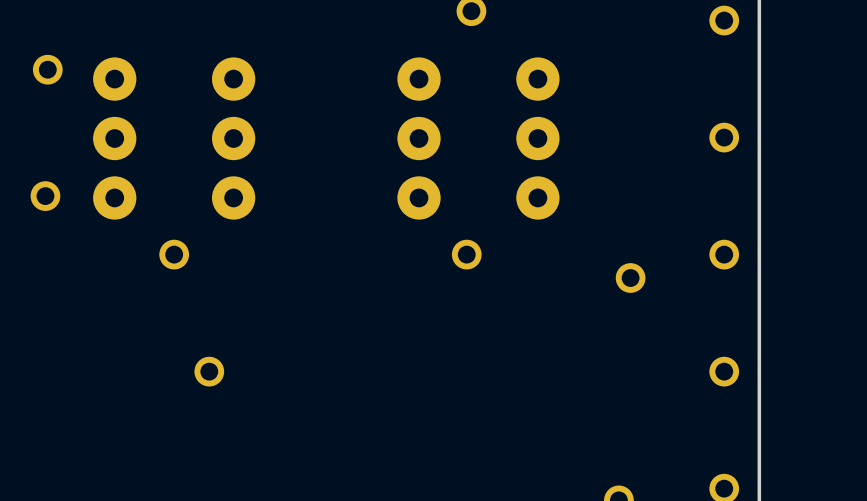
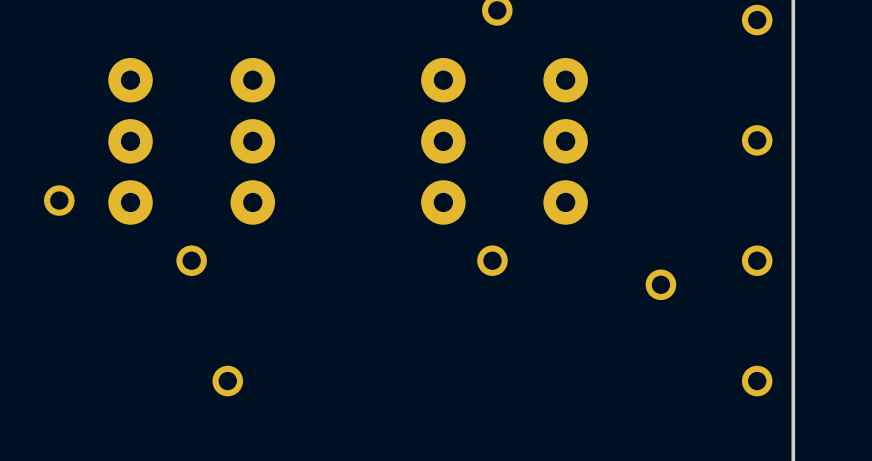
part: (47, 69) -> none

